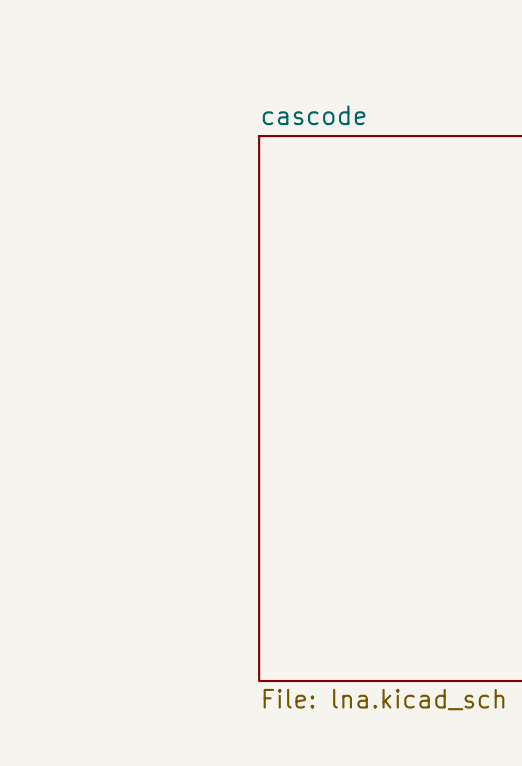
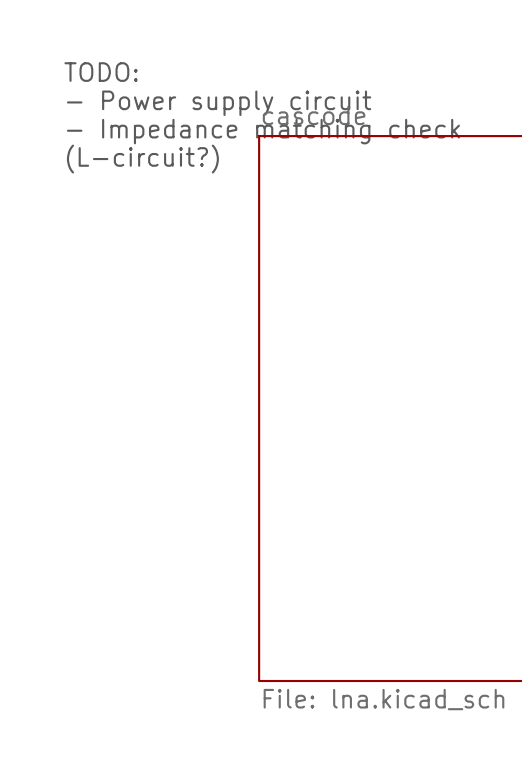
text: none -> TODO: (101, 72)
text: none -> - Power supply circuit (219, 103)
text: none -> - Impedance matching check (263, 131)
text: none -> (L-circuit?) (142, 159)

